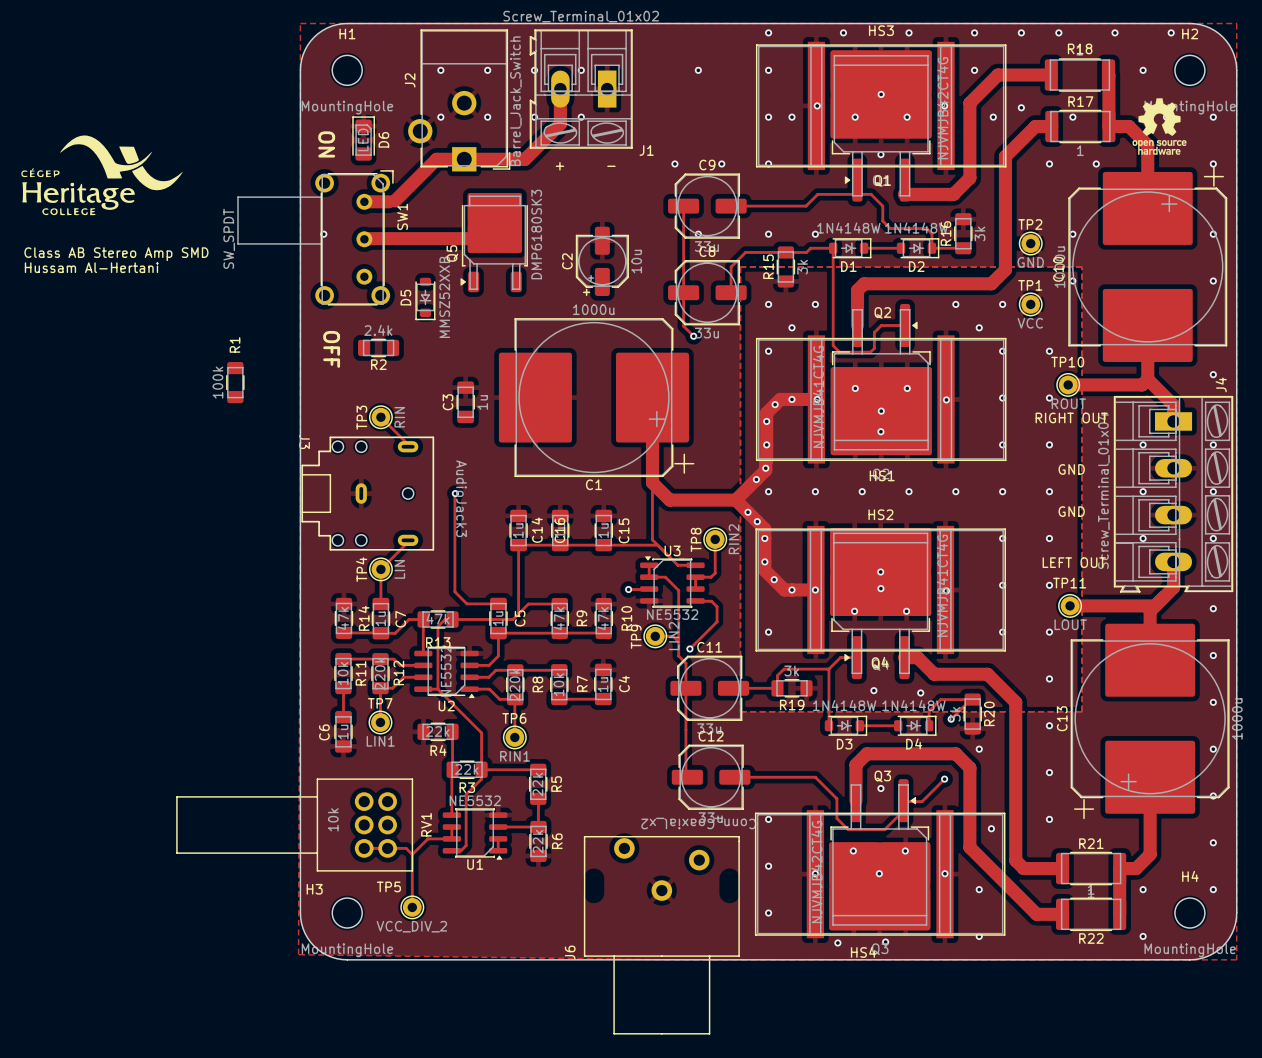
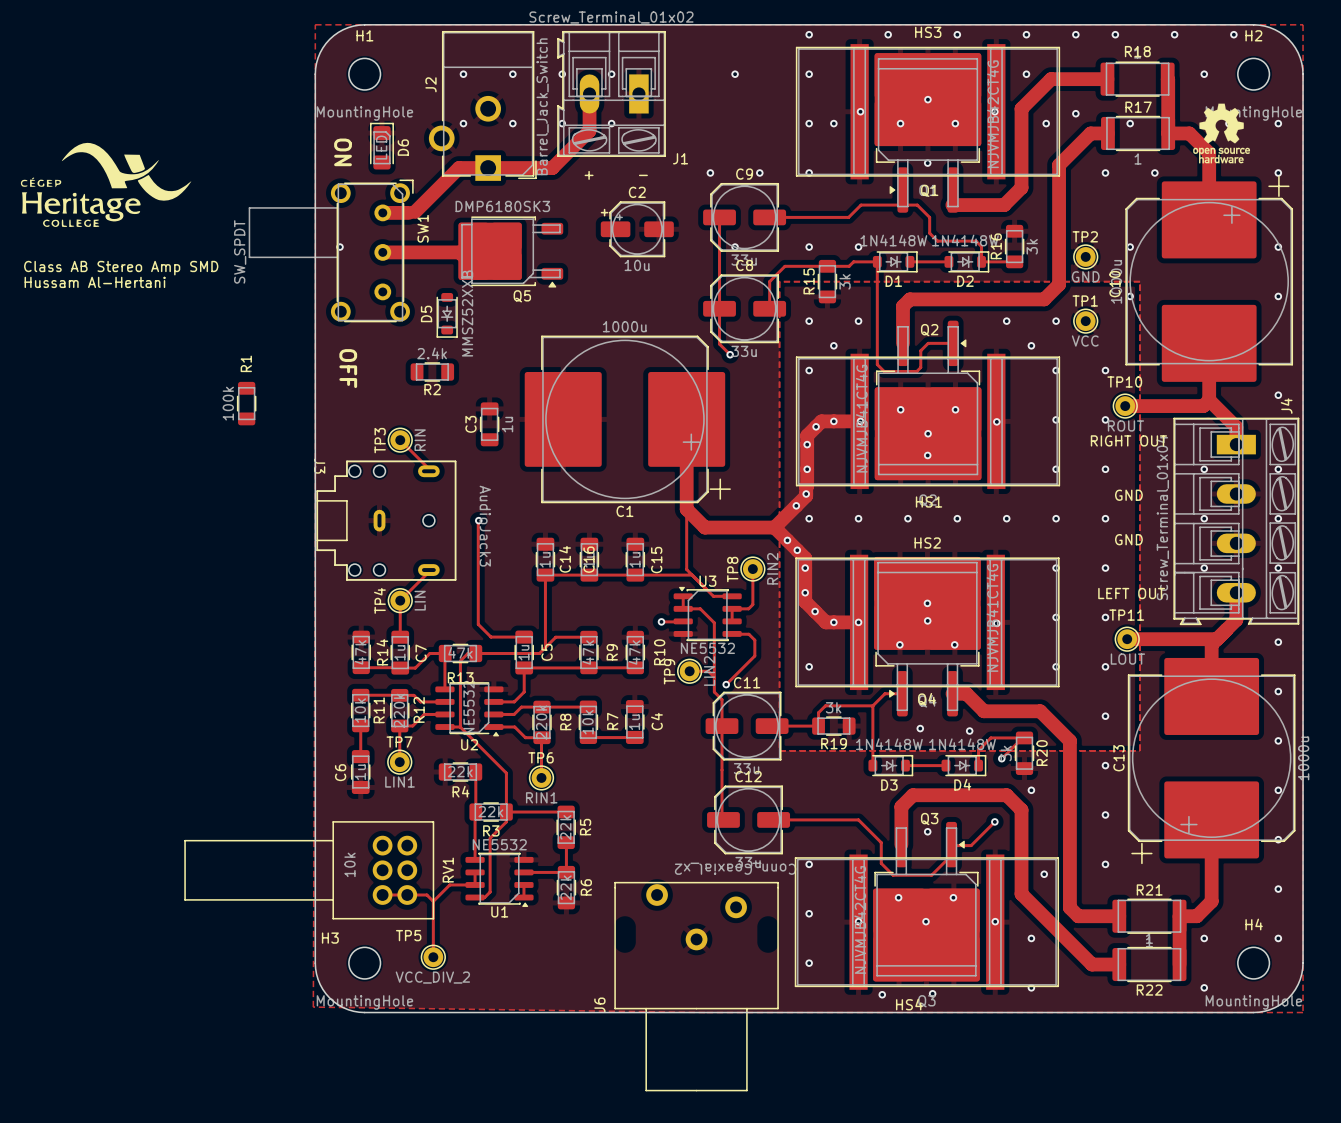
track: (365, 238) (480, 238) -> none
track: none -> (382, 252) (459, 252) (473, 266)
Q5 rotation: 0° (494, 242) -> 90° counterclockwise (510, 252)
C2 rotation: 0° (602, 261) -> 90° clockwise (637, 229)
C2 position: (602, 261) -> (637, 229)
R2 position: (378, 347) -> (432, 372)

